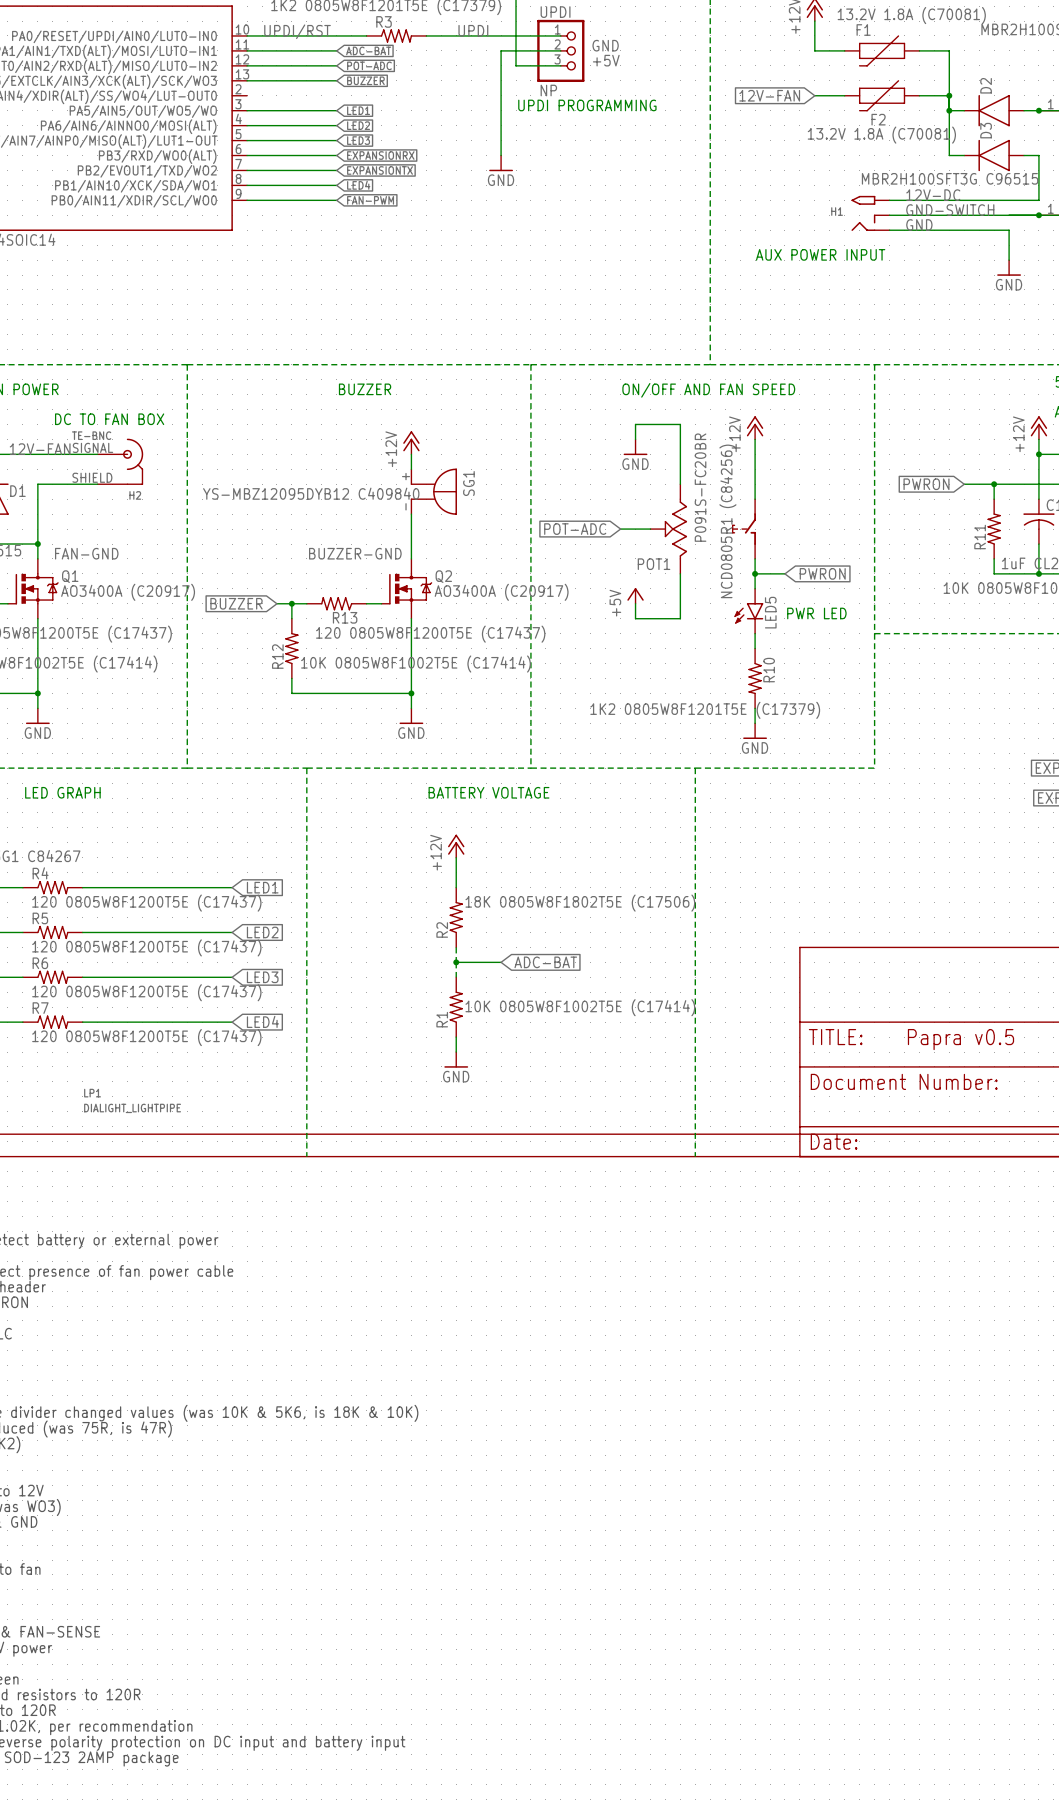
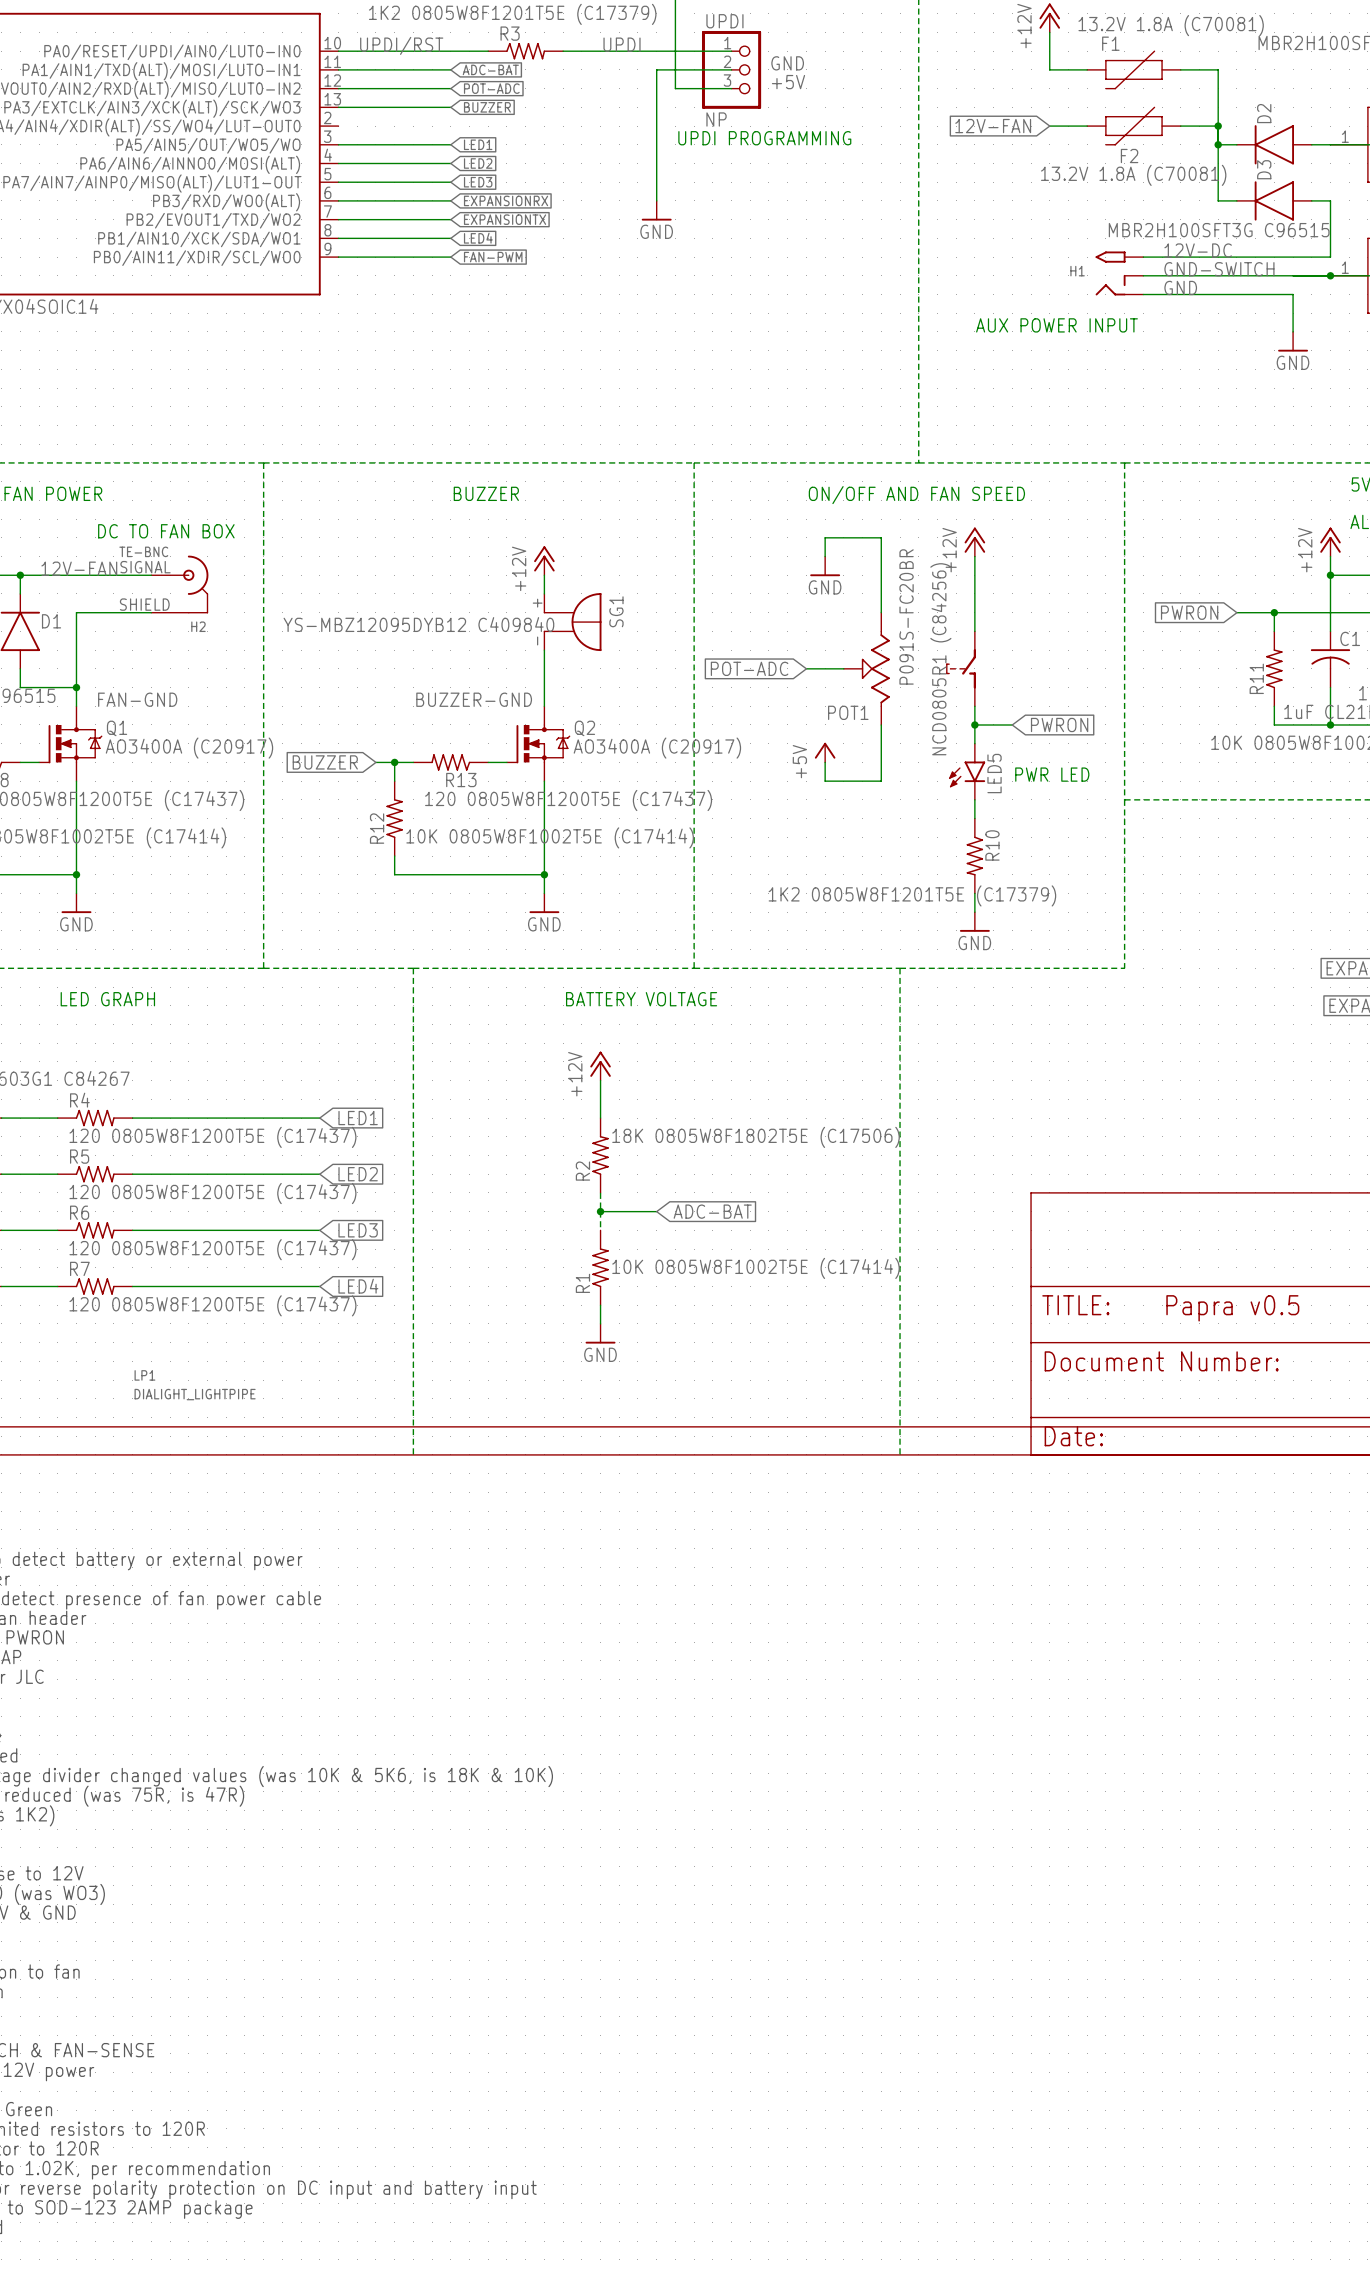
junction: (1038, 110) -> none

